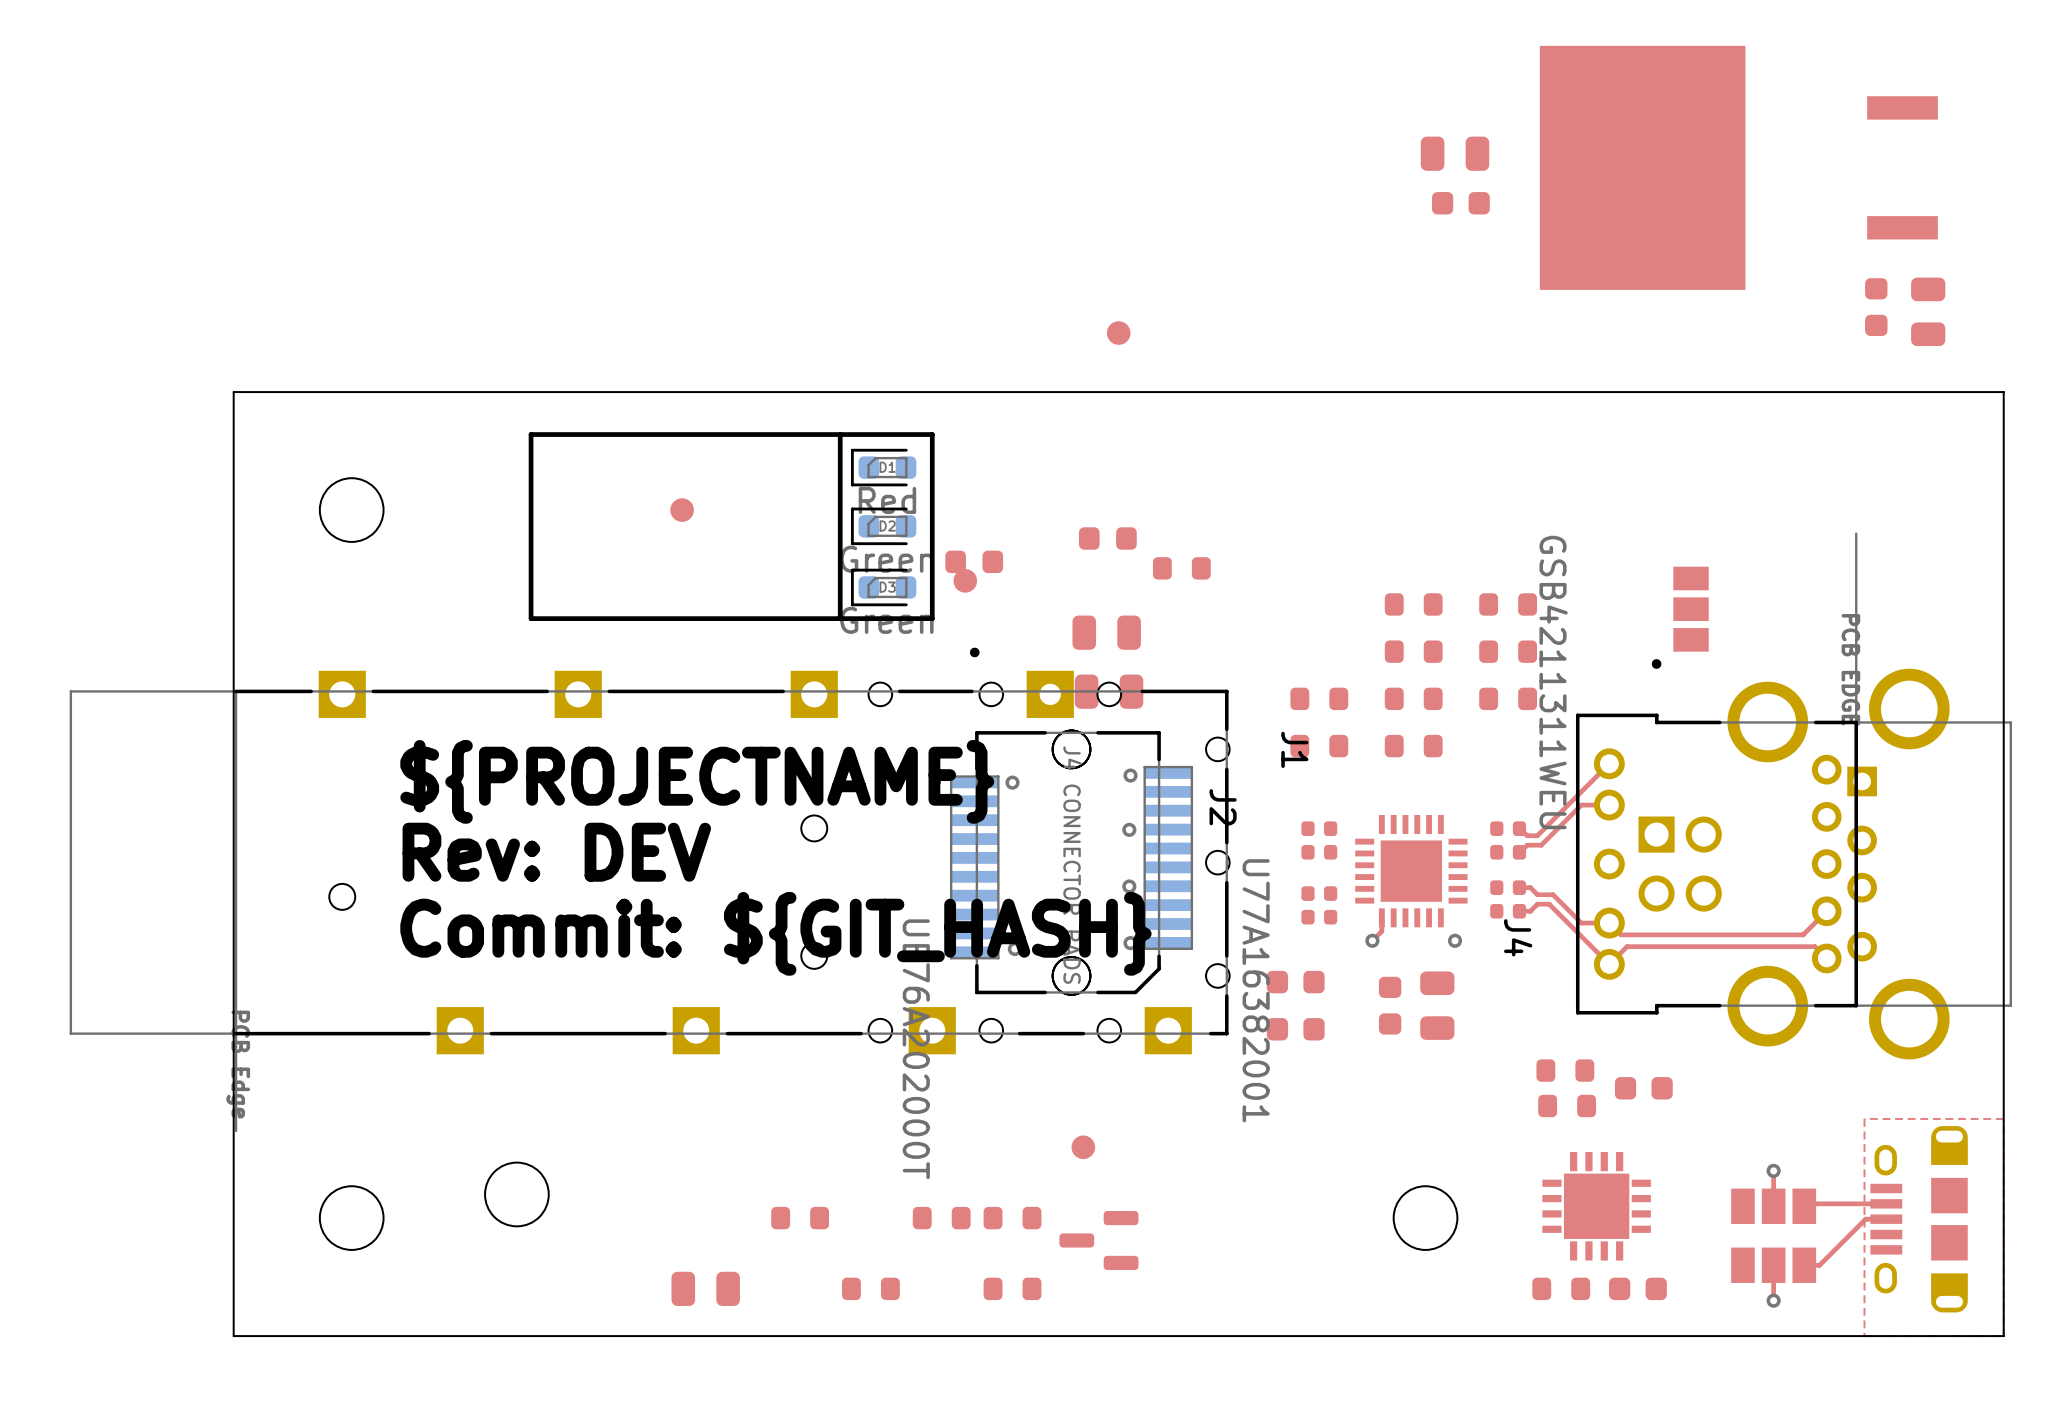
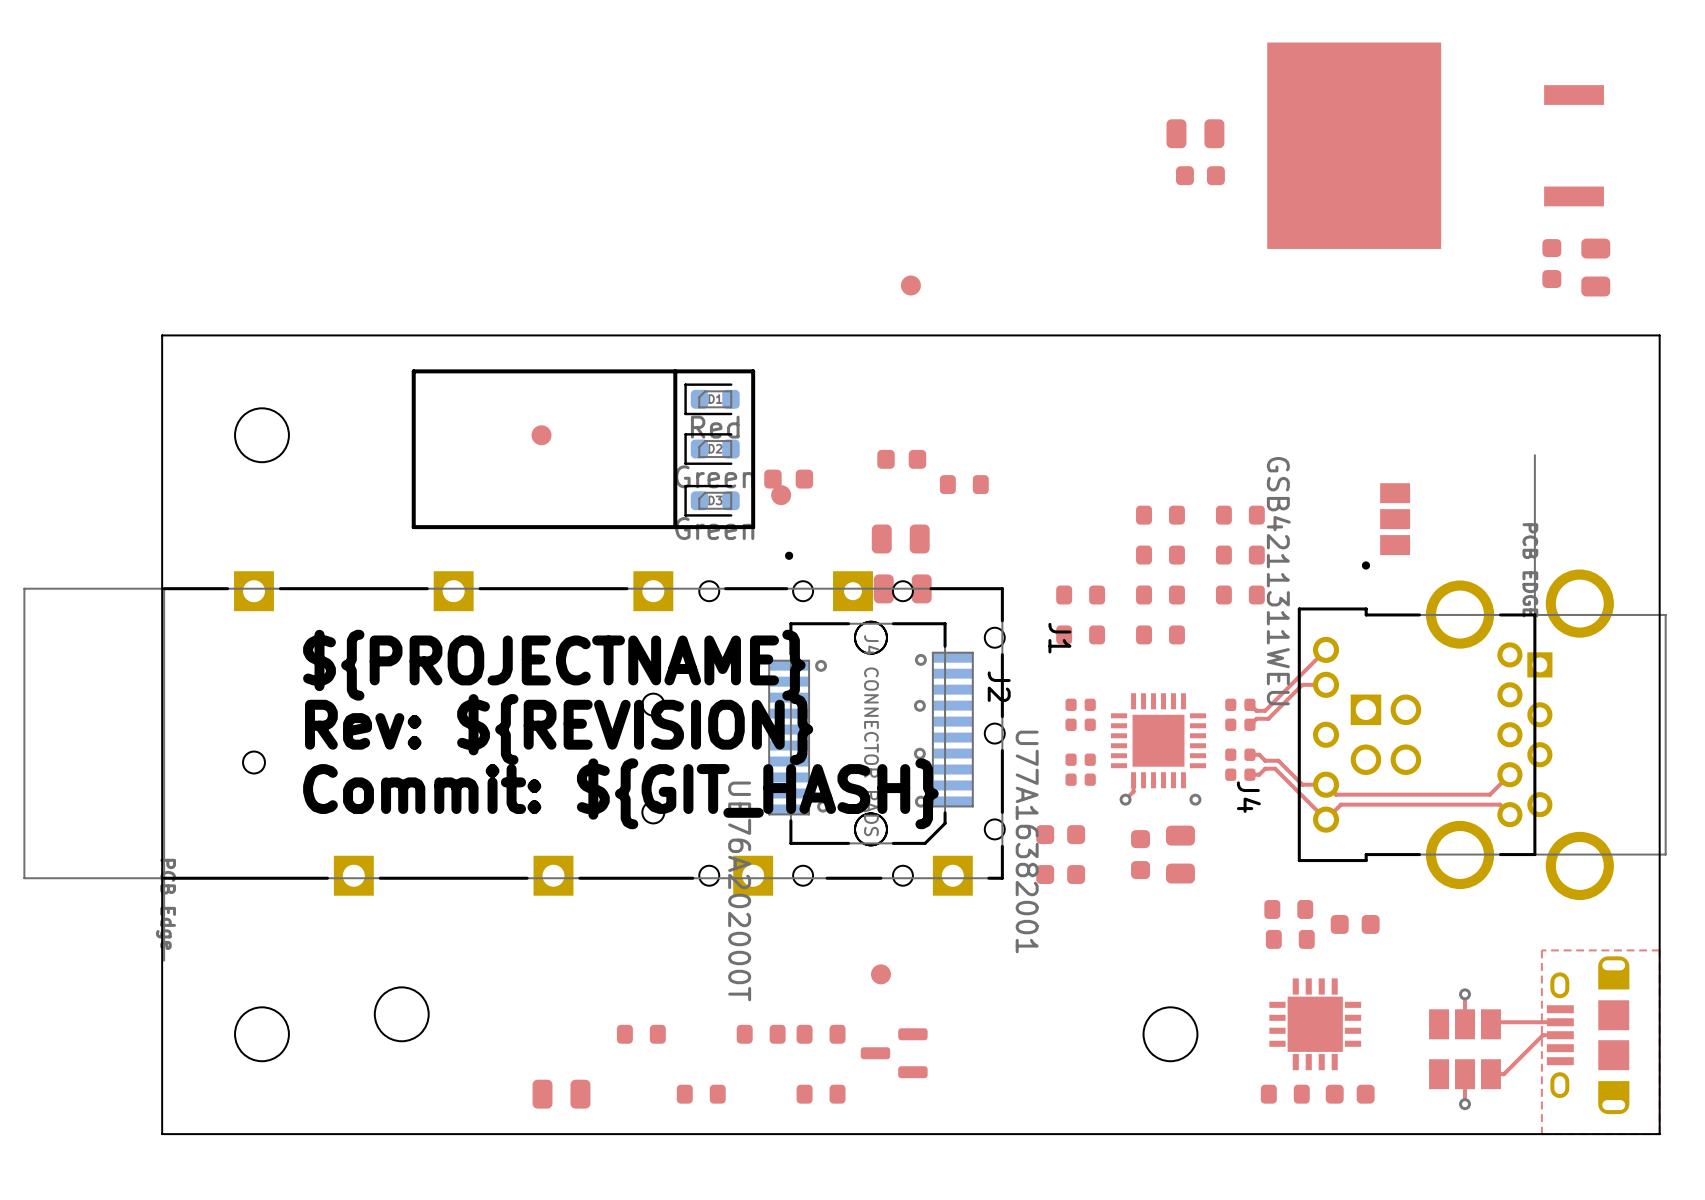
text: Rev: DEV (556, 852) -> Rev: ${REVISION} (559, 729)

